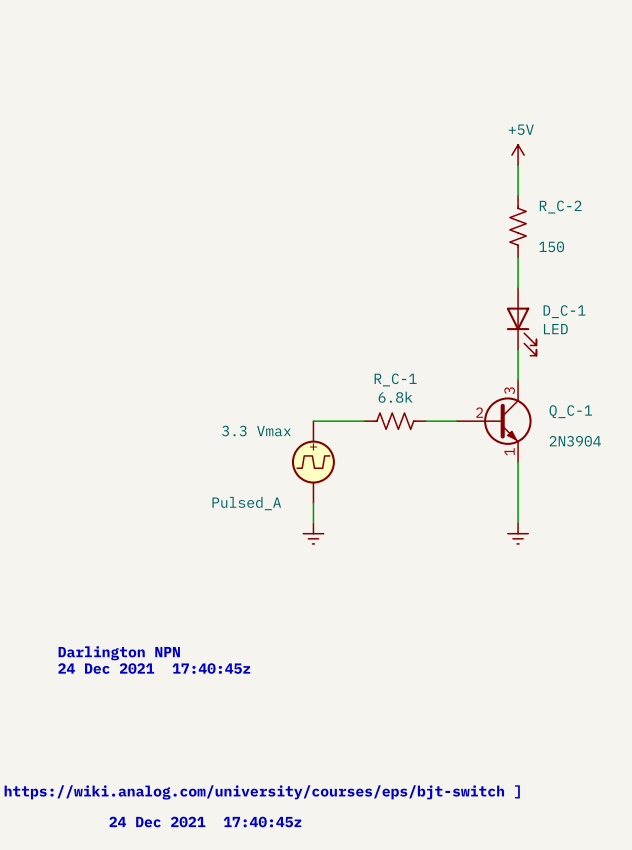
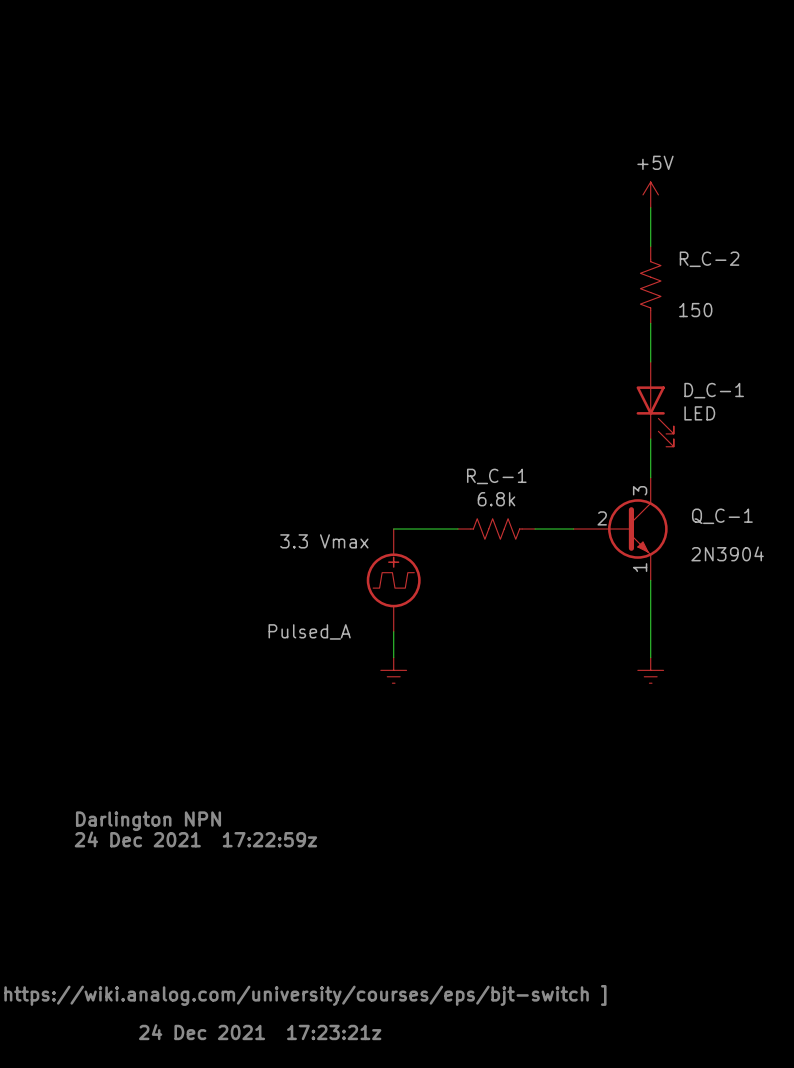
text: 24 Dec 2021 17:40:45z (154, 668) -> 24 Dec 2021 17:22:59z (195, 839)
text: 24 Dec 2021 17:40:45z (205, 821) -> 24 Dec 2021 17:23:21z (260, 1032)

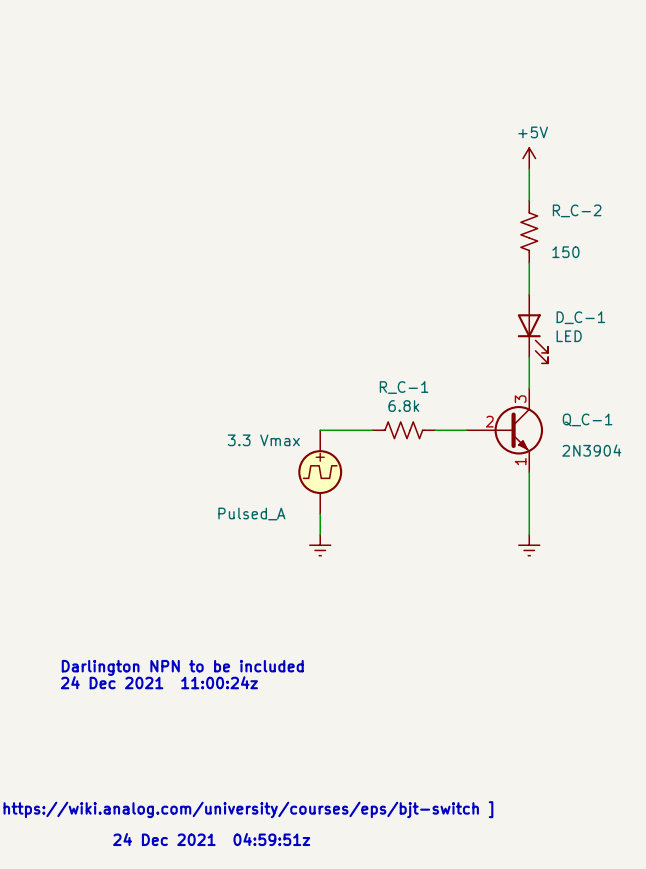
text: Darlington NPN (148, 821) -> Darlington NPN to be included (182, 667)
text: 24 Dec 2021 17:22:59z (195, 839) -> 24 Dec 2021 11:00:24z (159, 682)
text: 24 Dec 2021 17:23:21z (260, 1032) -> 24 Dec 2021 04:59:51z (211, 839)

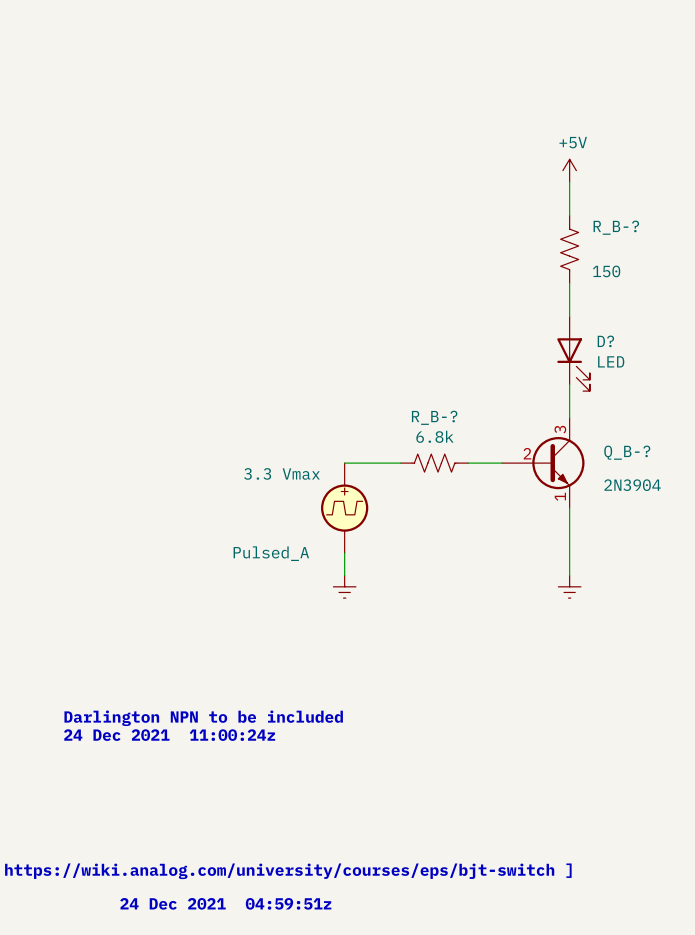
R_C-2 name: R_C-2 (577, 210) -> R_B-? (616, 227)
D_C-1 name: D_C-1 (580, 317) -> D? (605, 341)
R_C-1 name: R_C-1 (404, 387) -> R_B-? (434, 417)
Q_C-1 name: Q_C-1 (587, 419) -> Q_B-? (627, 452)

